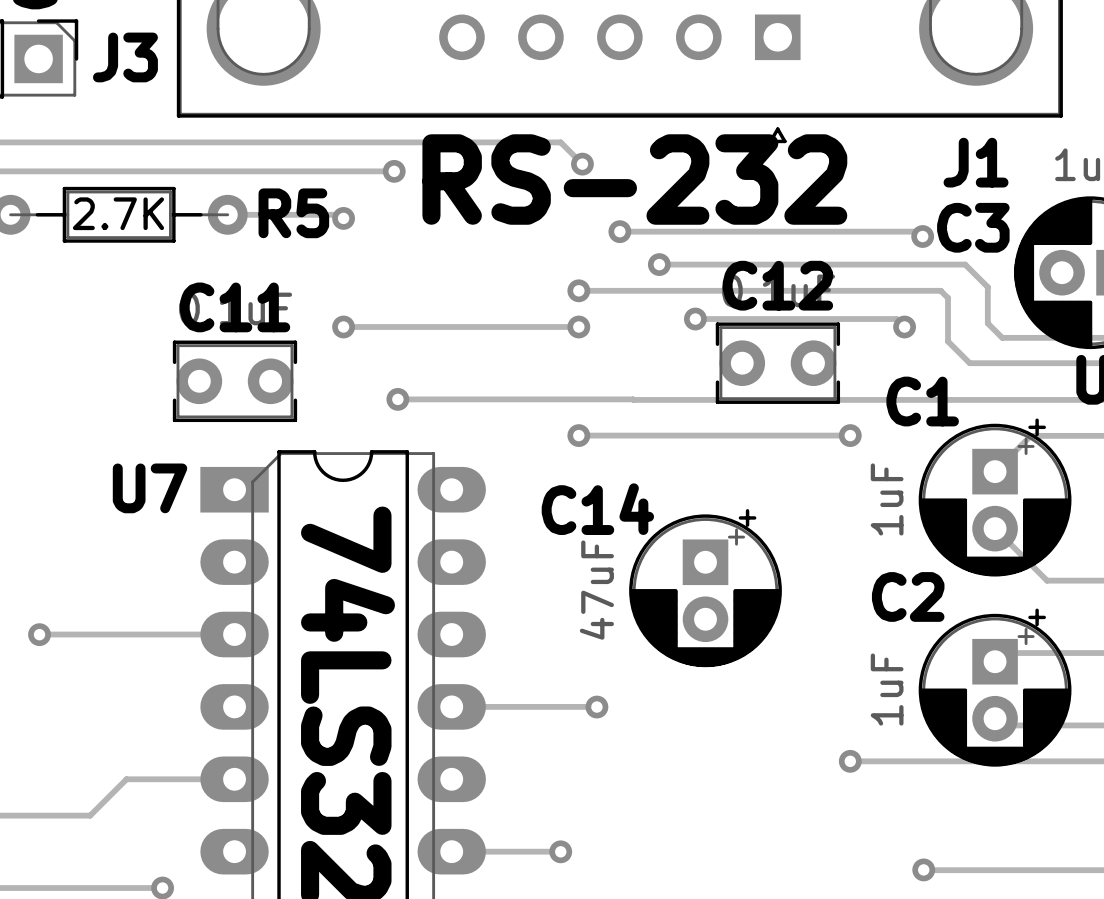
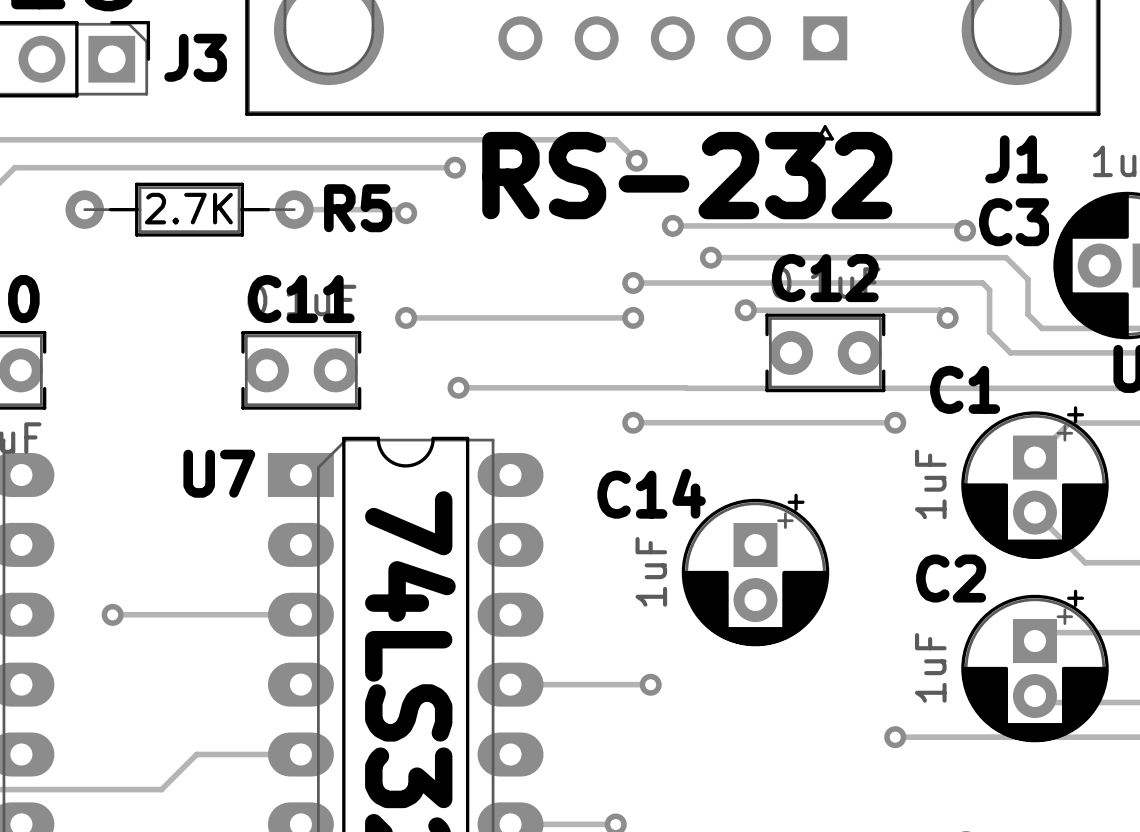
C14 value: 47uF (596, 590) -> 1uF (651, 571)

